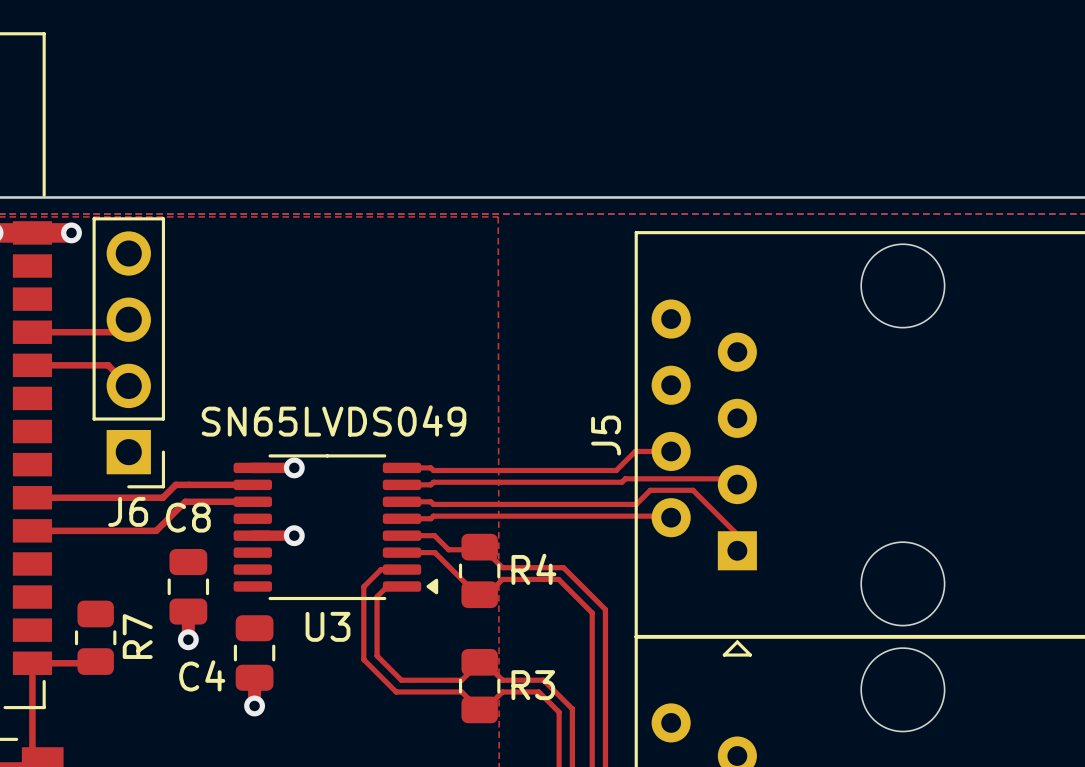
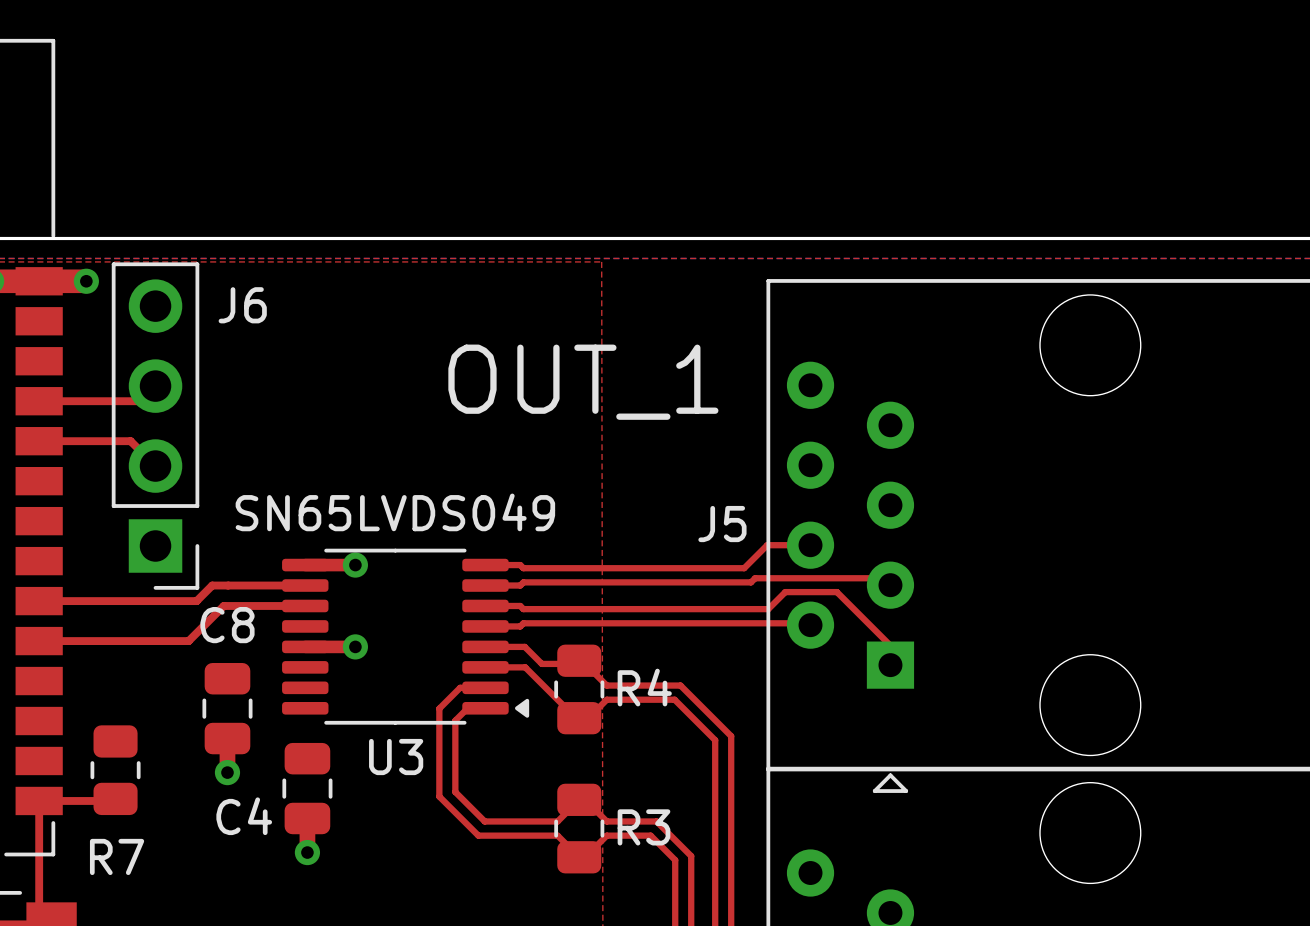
text: none -> OUT_1 (583, 382)
text: SN65LVDS049 (334, 421) -> none
U3 value: none -> SN65LVDS049 (395, 512)
J5 name rotation: 0° (606, 435) -> 90° clockwise (722, 524)
J6 name position: J6 (128, 511) -> J6 (242, 305)
R7 name rotation: 0° (137, 636) -> 90° clockwise (117, 856)
R7 name position: R7 (137, 636) -> R7 (117, 856)

